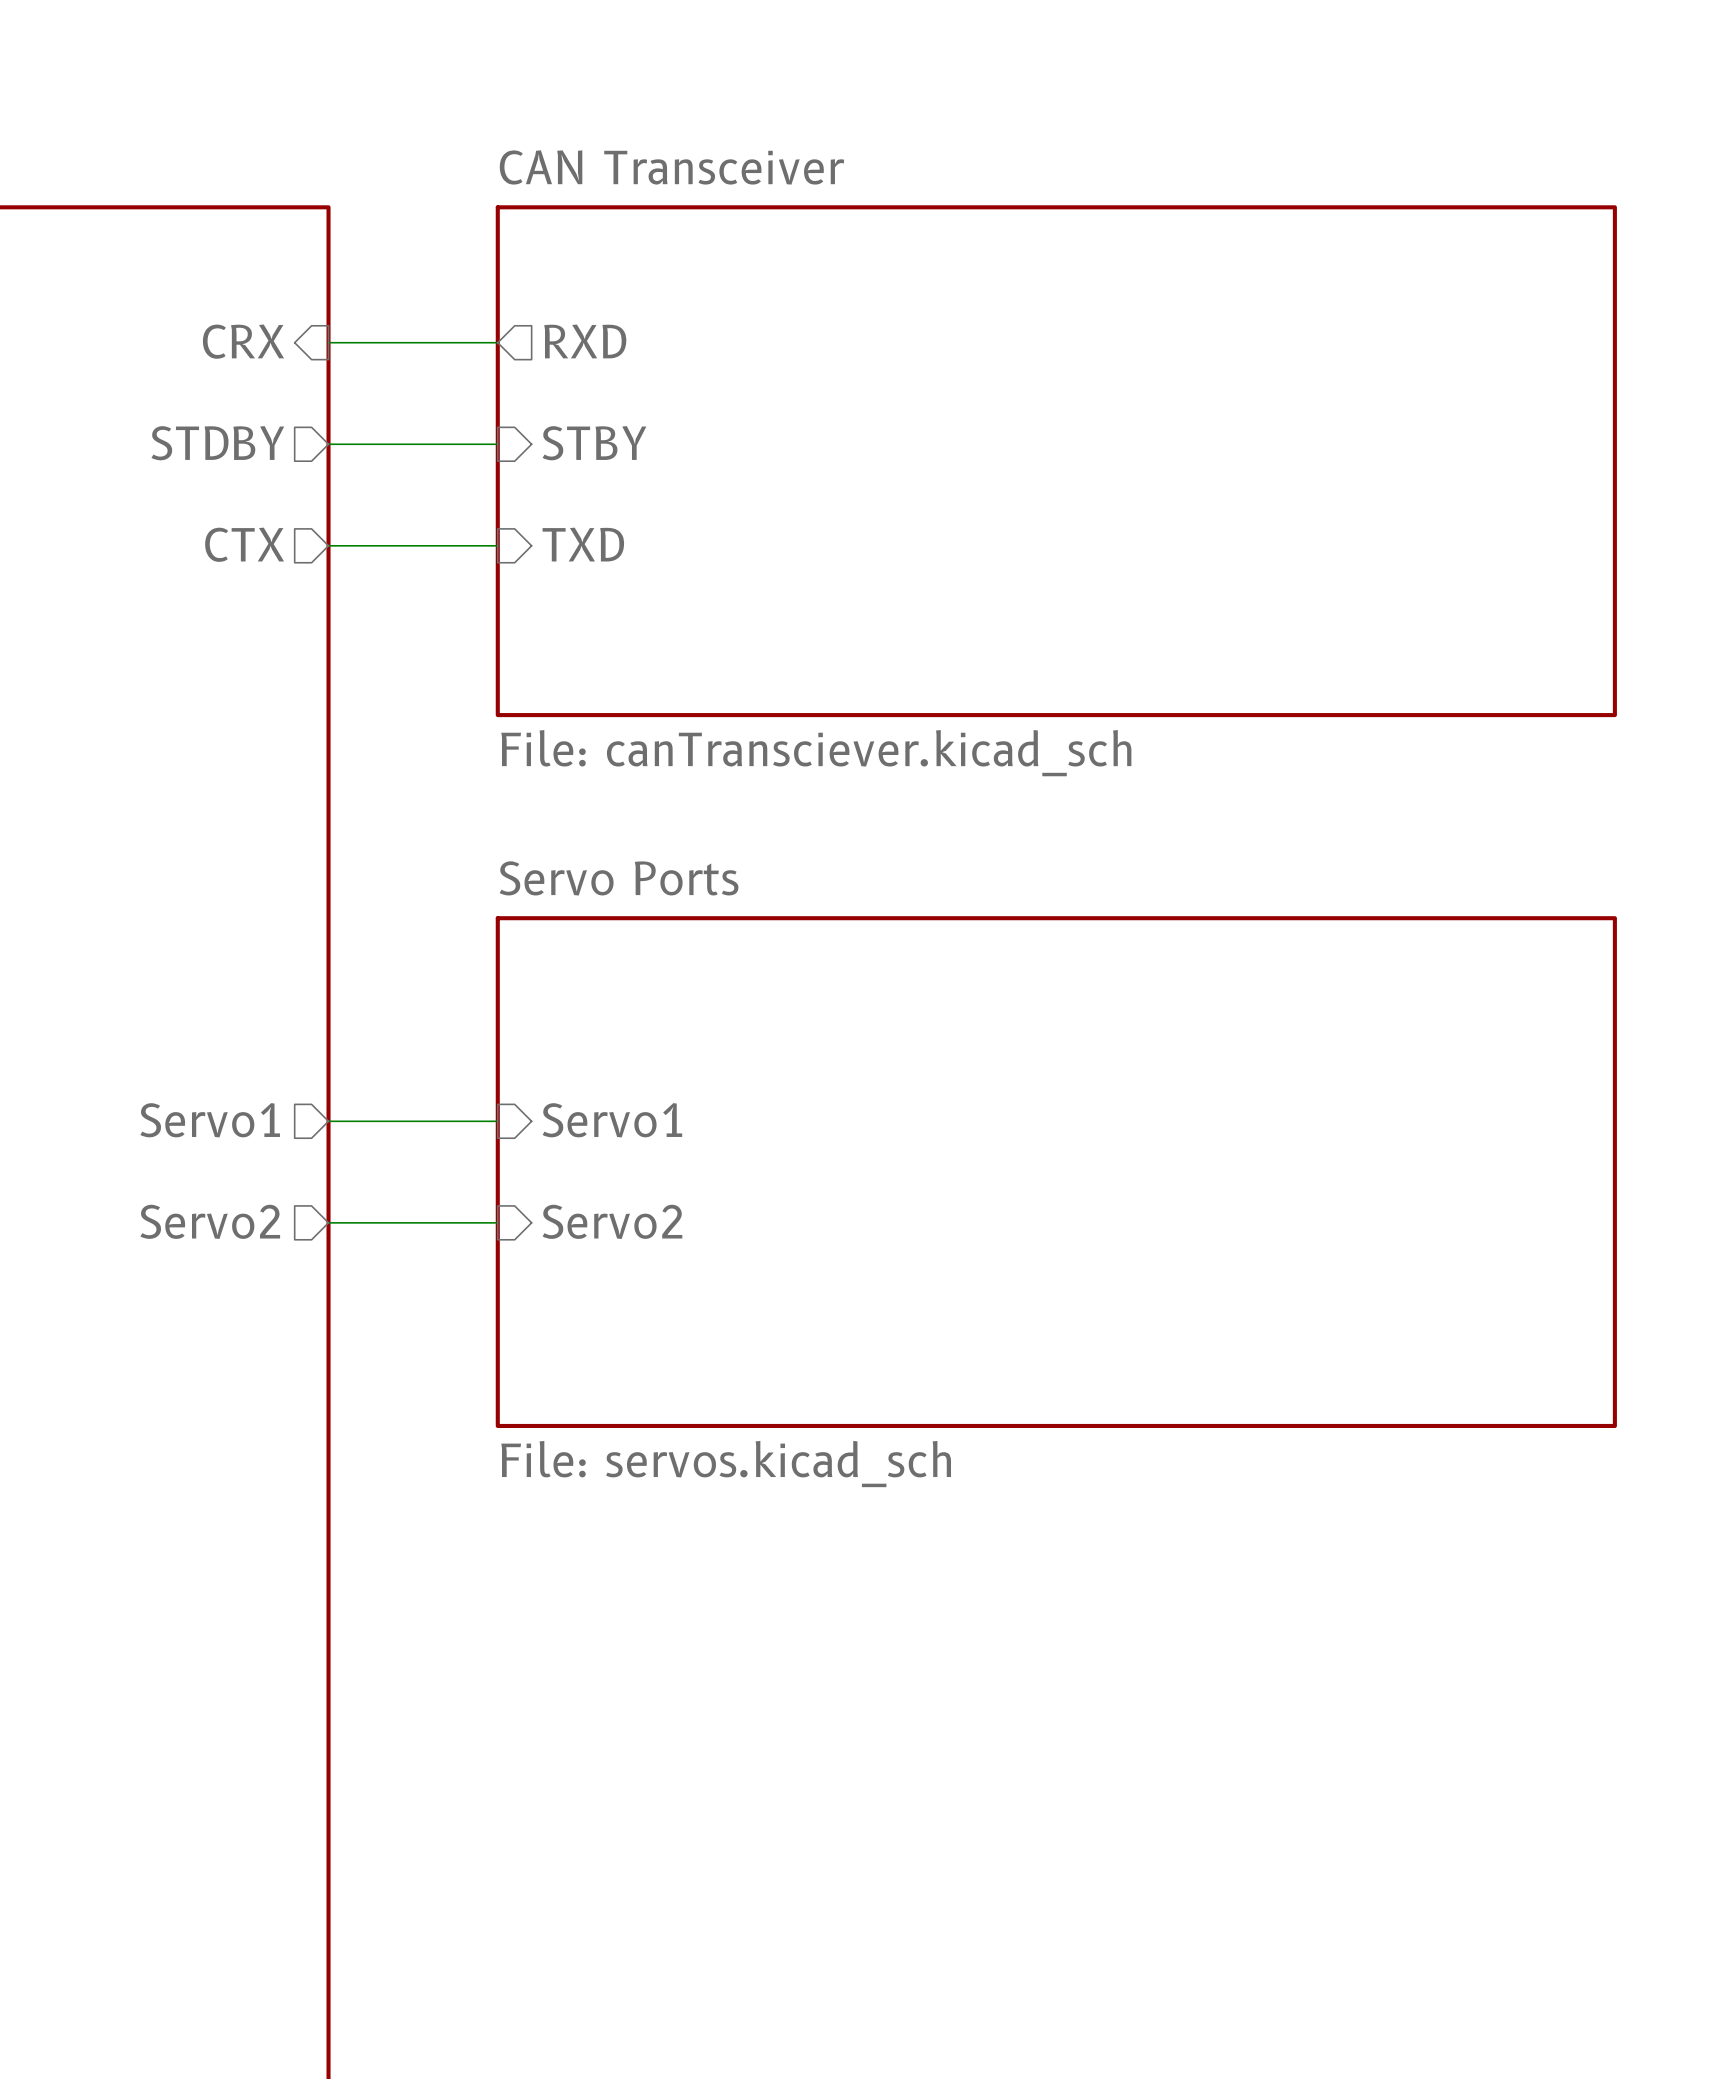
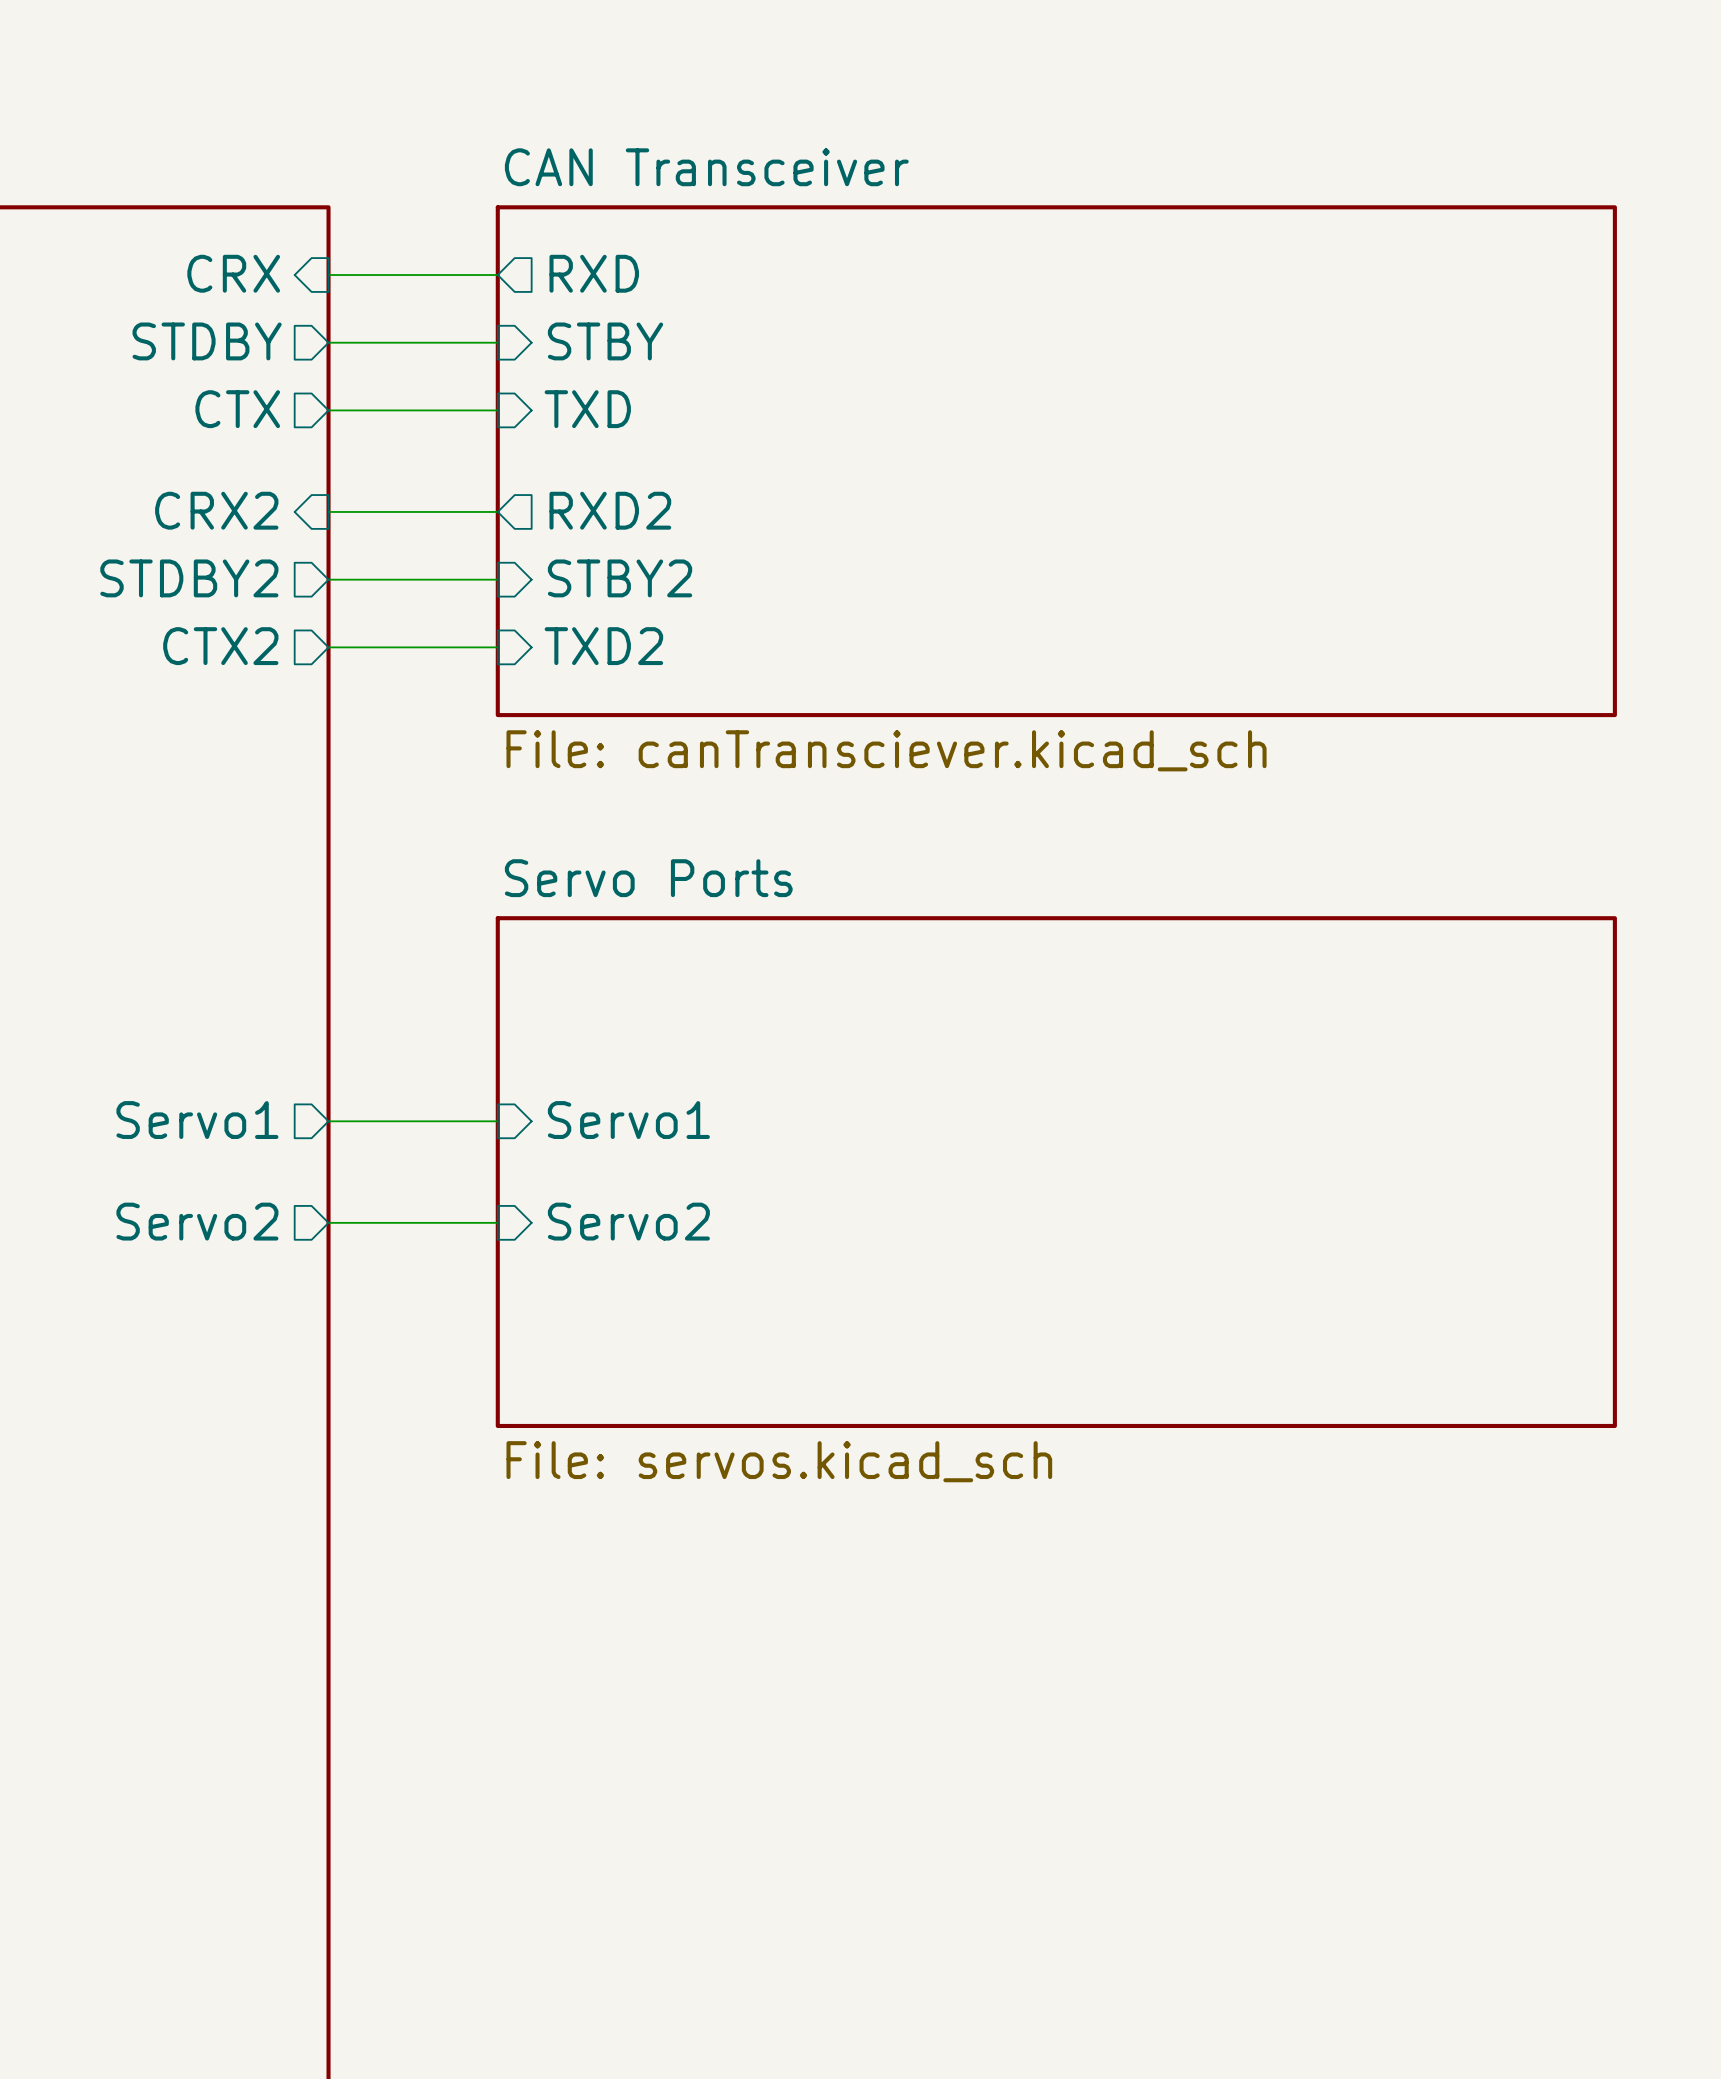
sheet pin: none -> CRX (233, 273)
sheet pin: none -> RXD (594, 273)
wire: none -> (328, 275) (497, 275)
sheet pin shape: input (243, 341) -> output (207, 341)
sheet pin: CRX (243, 341) -> STDBY (207, 341)
sheet pin shape: output (585, 341) -> input (605, 341)
sheet pin: RXD (585, 341) -> STBY (605, 341)
sheet pin: STDBY (217, 443) -> none
sheet pin: STBY (594, 443) -> none
wire: (328, 444) (497, 444) -> (328, 410) (497, 410)
sheet pin: none -> CRX2 (216, 510)
sheet pin: none -> RXD2 (610, 510)
sheet pin position: CTX (244, 544) -> CTX (237, 409)
sheet pin position: TXD (583, 544) -> TXD (587, 409)
wire: (328, 545) (497, 545) -> (328, 511) (497, 511)
sheet pin: none -> STDBY2 (189, 578)
sheet pin: none -> STBY2 (620, 578)
wire: none -> (328, 579) (497, 579)
sheet pin: none -> CTX2 (220, 646)
sheet pin: none -> TXD2 (603, 646)
wire: none -> (328, 647) (497, 647)

